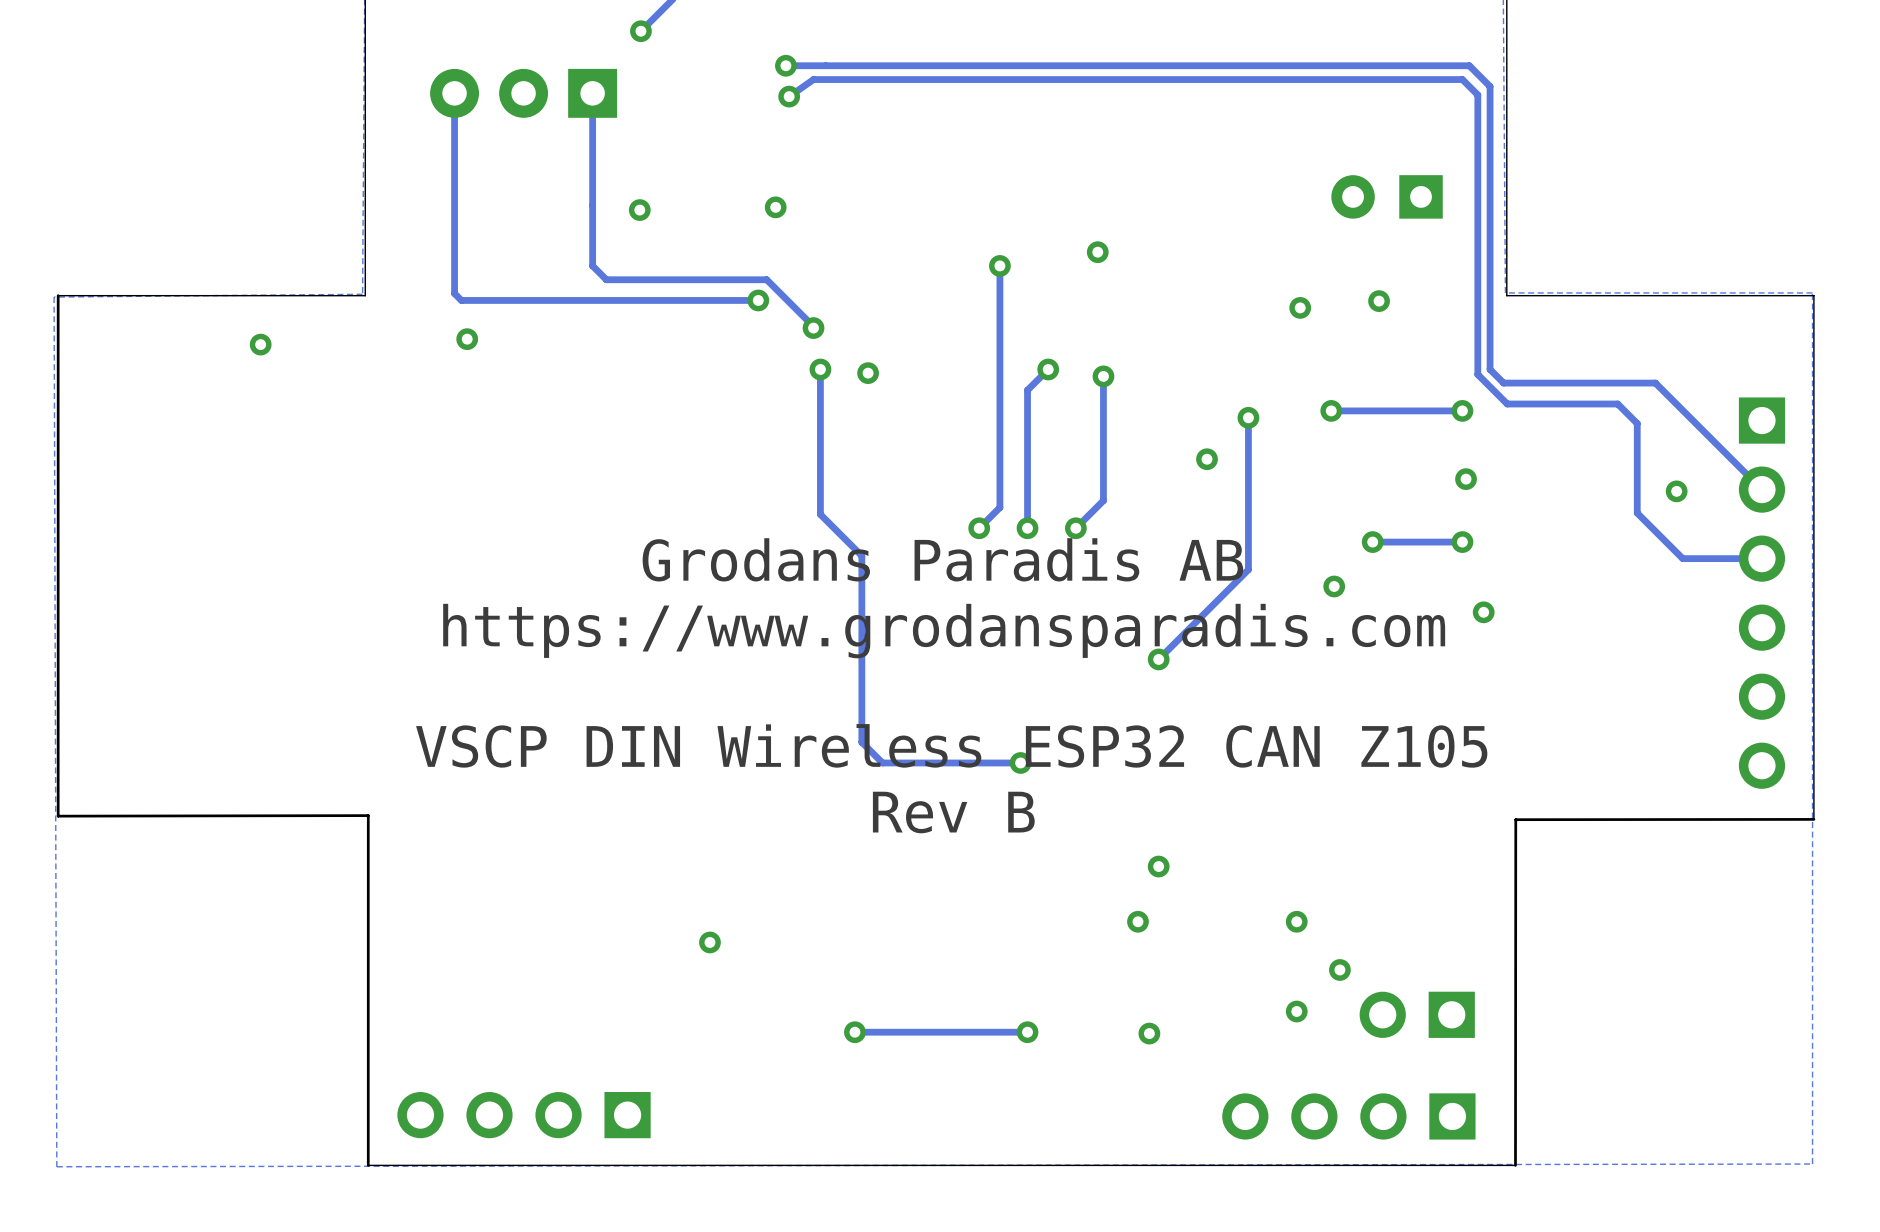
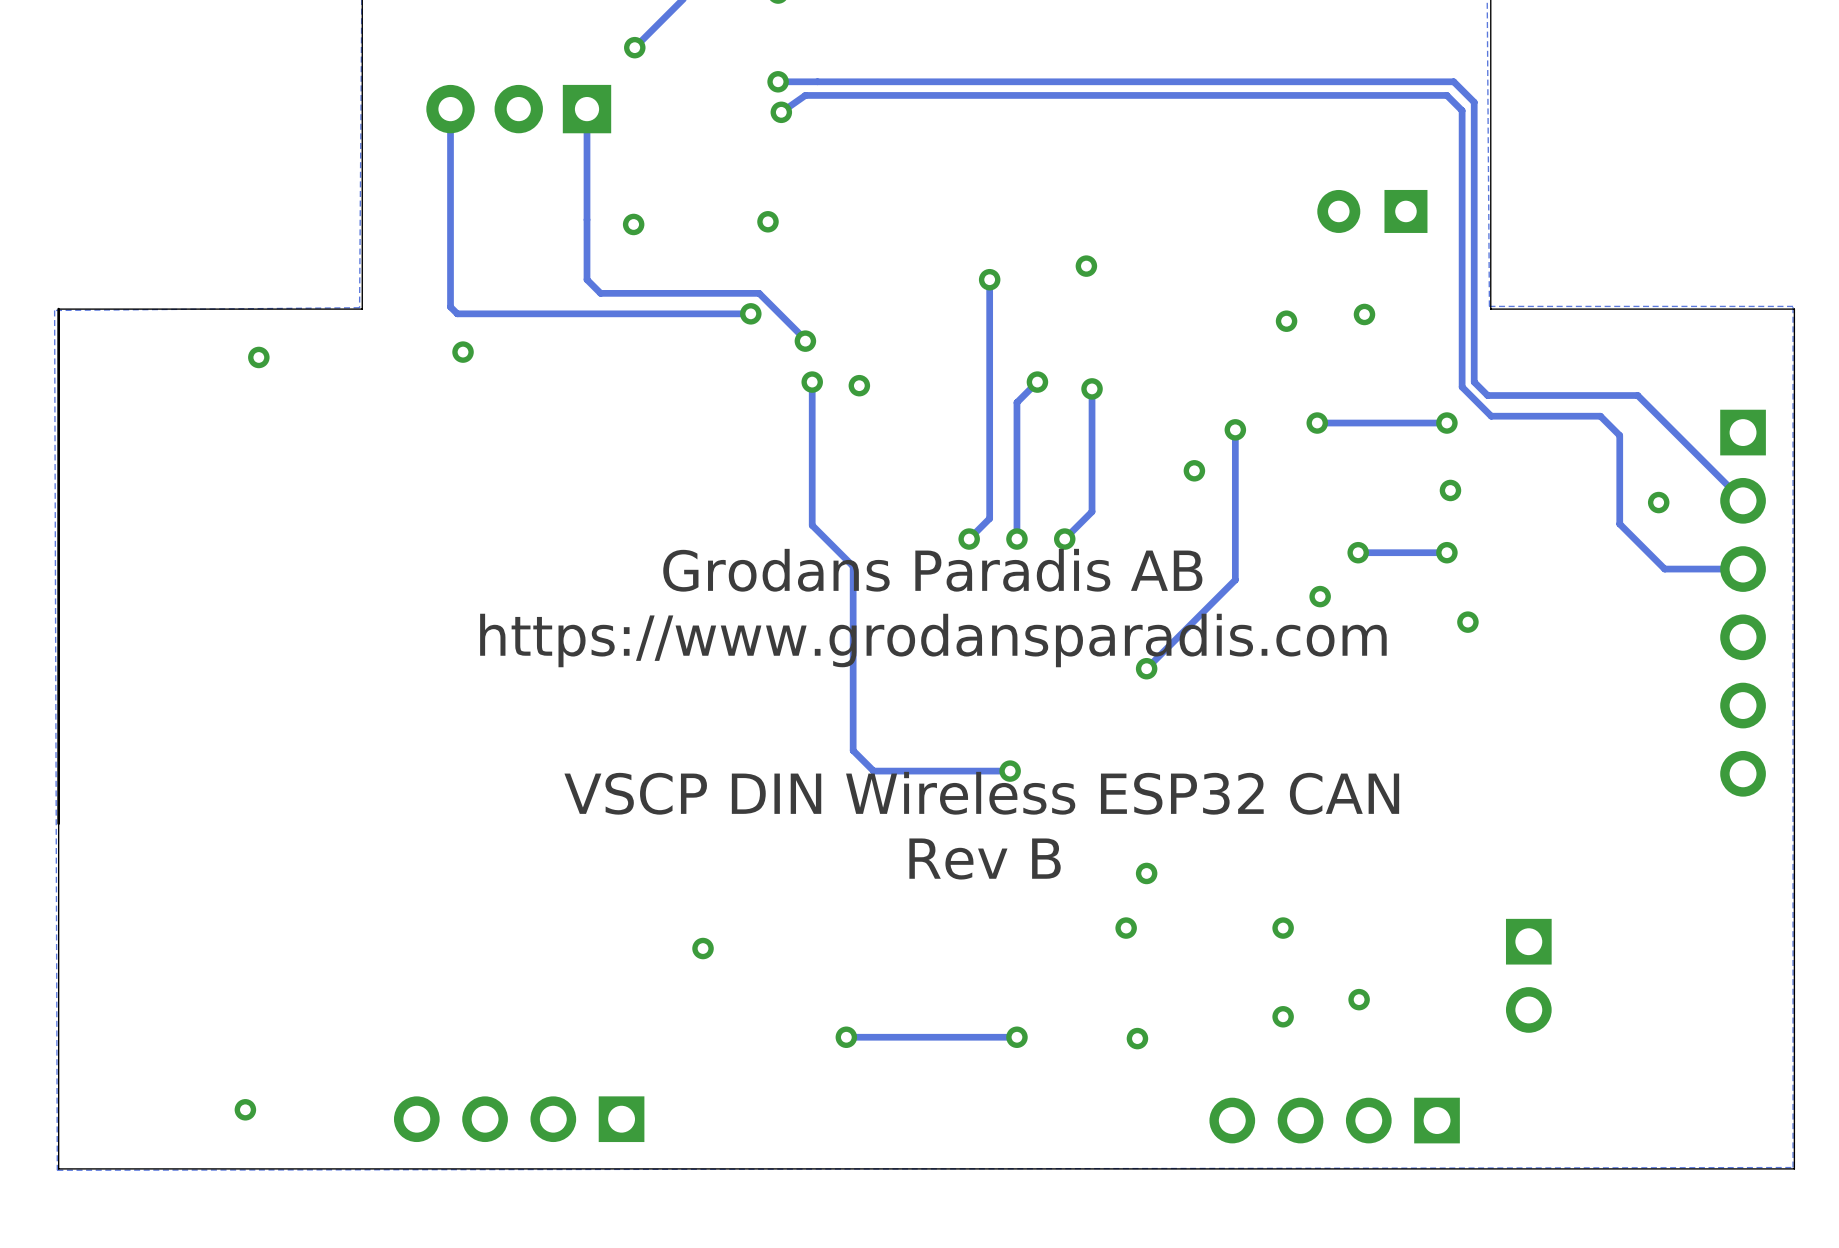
text: VSCP DIN Wireless ESP32 CAN Z105 (951, 745) -> VSCP DIN Wireless ESP32 CAN (981, 793)
text position: Rev B (953, 812) -> Rev B (985, 859)
board edge: (58, 816) (368, 815) (368, 1165) -> (58, 823) (58, 1168) (365, 1168)
board edge: (1813, 819) (1515, 819) (1515, 1165) -> (1794, 826) (1794, 1168) (1499, 1168)
via position: (1339, 969) -> (1359, 999)
part rotation: 0° (1417, 1014) -> 90° counterclockwise (1528, 975)
part position: (1417, 1014) -> (1528, 975)
via: none -> (245, 1109)

